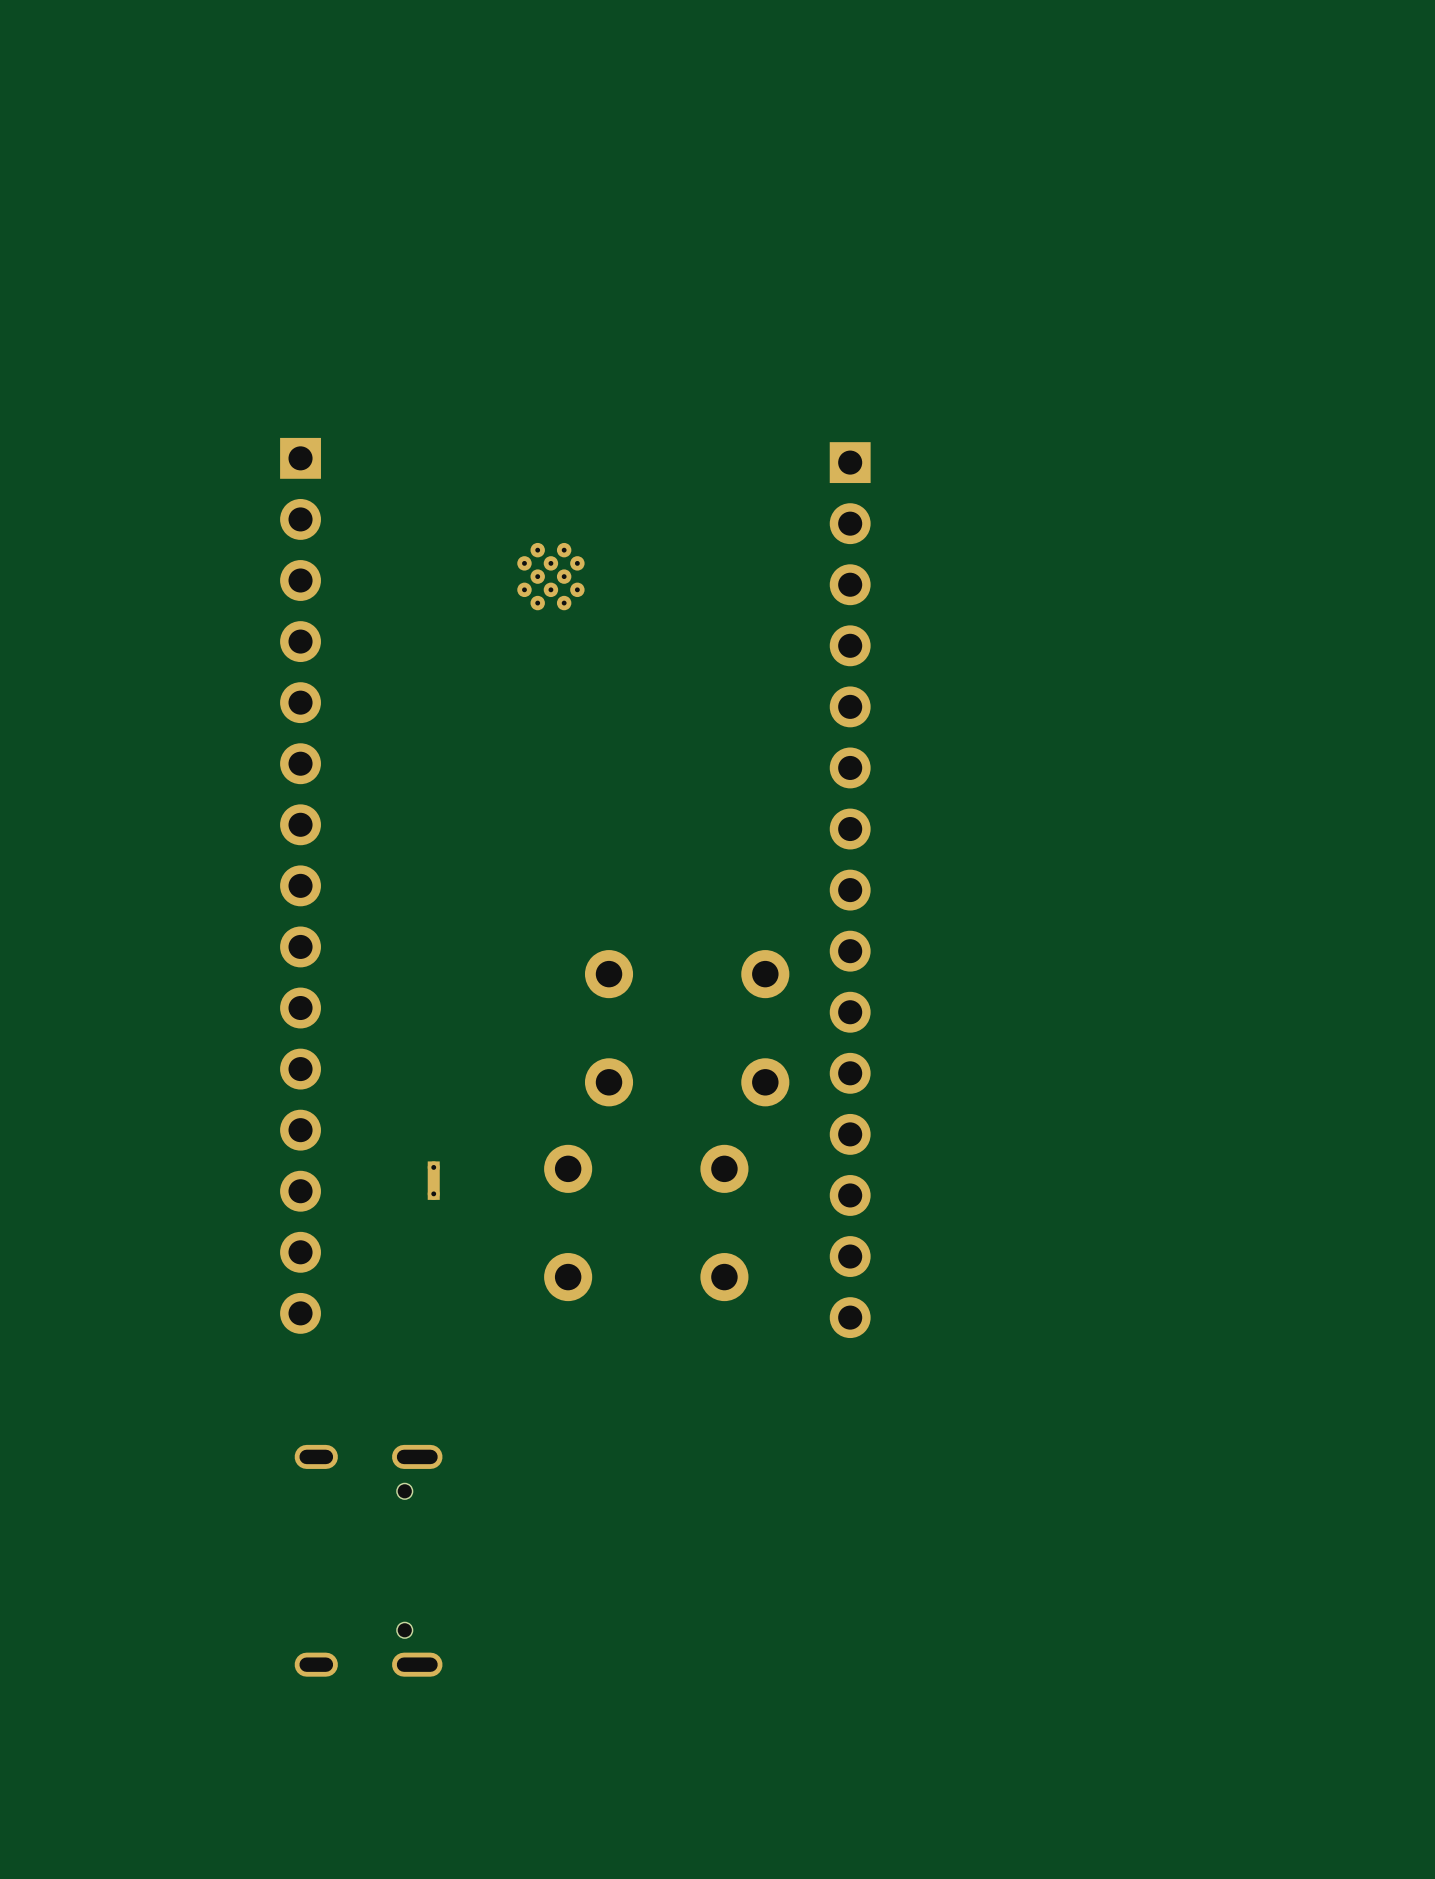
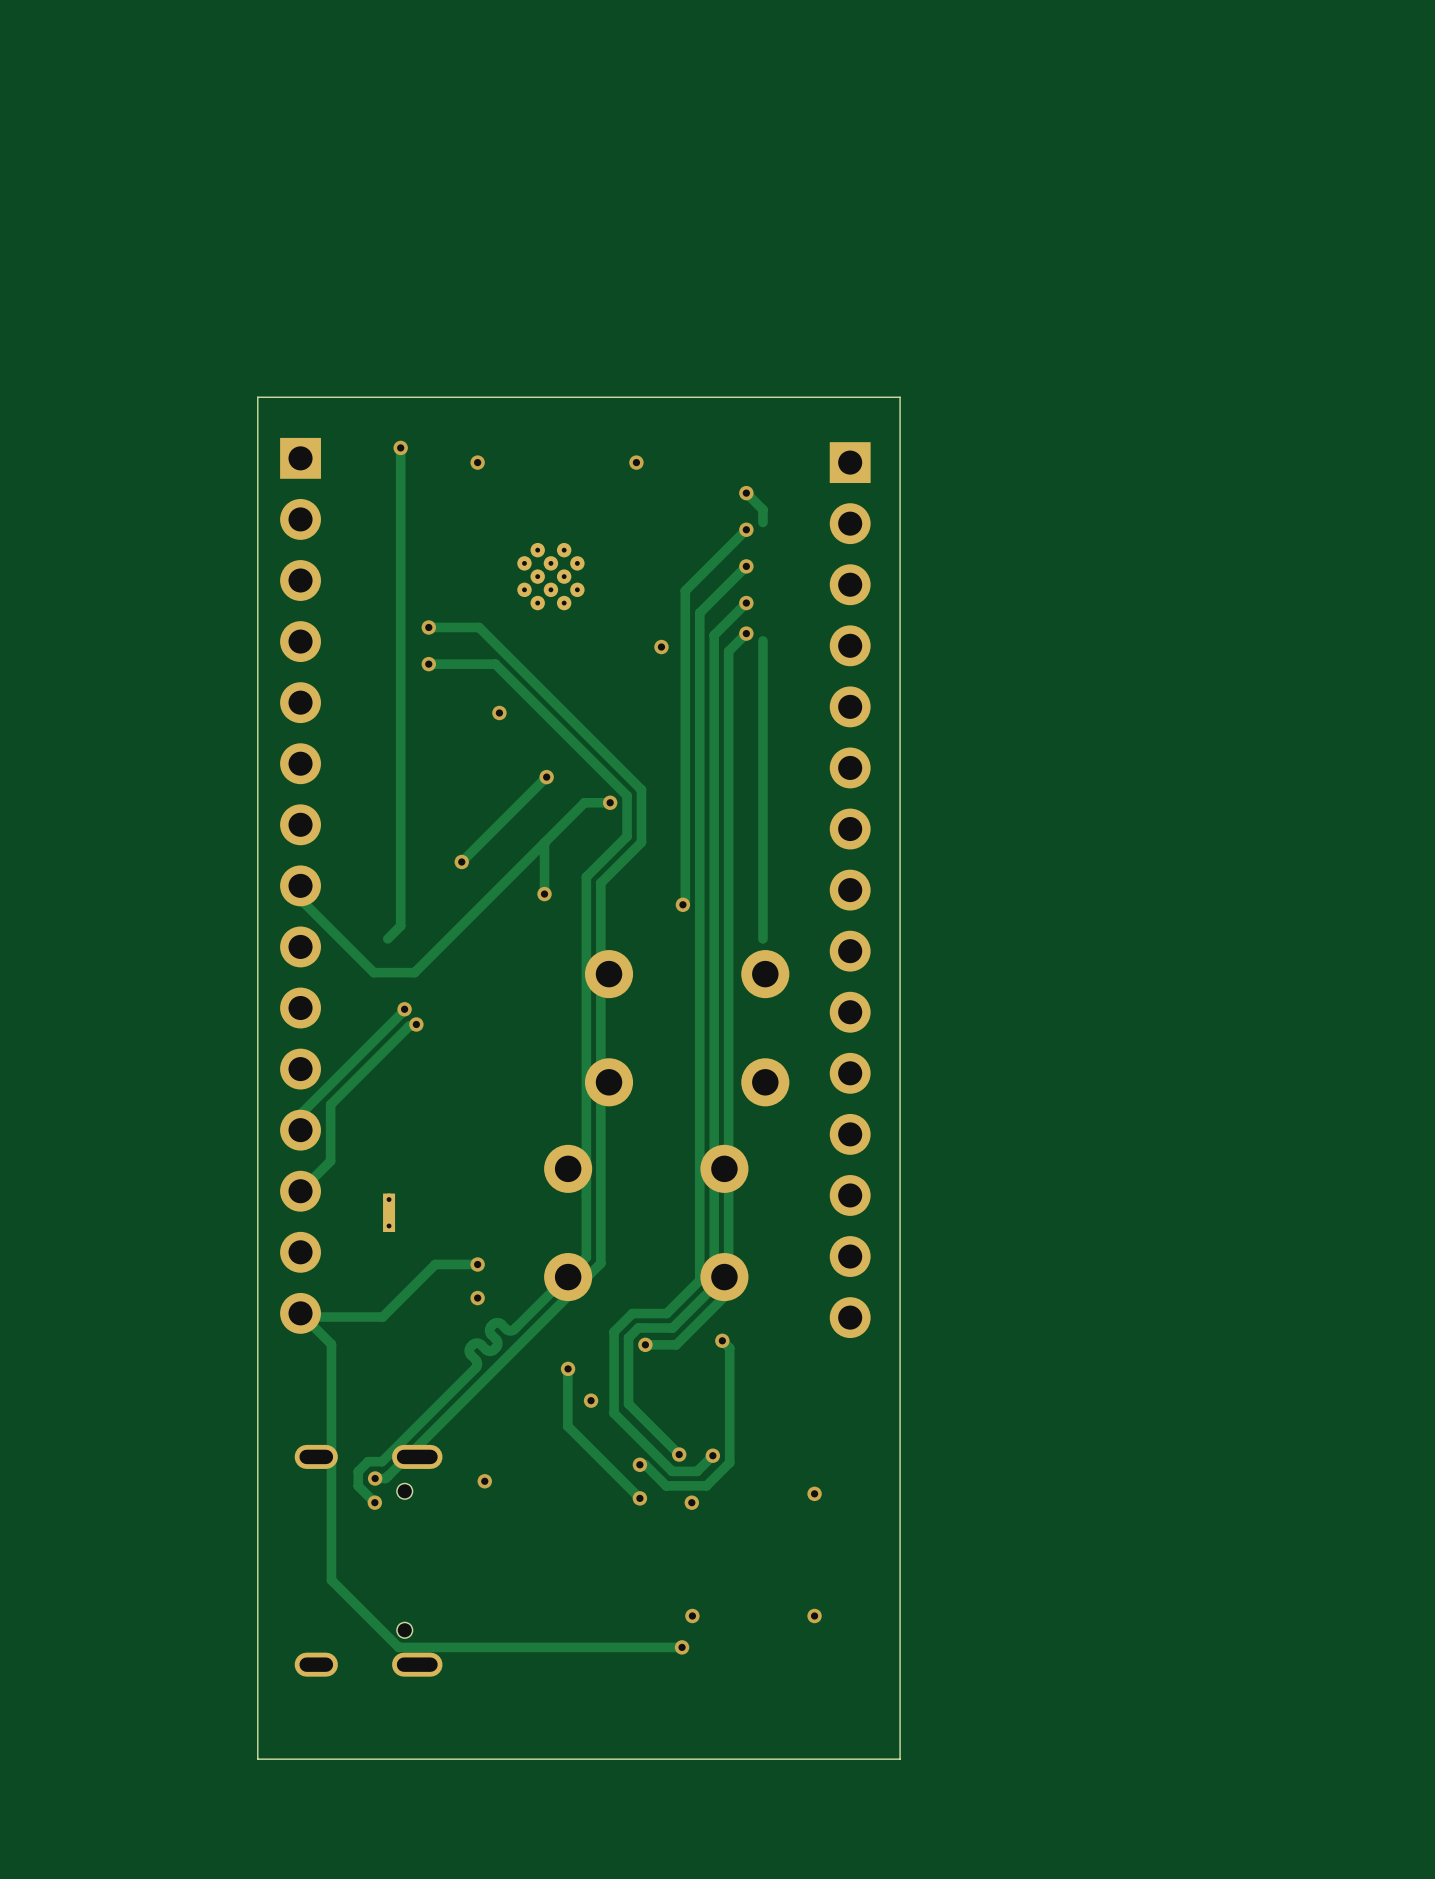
board edge: none -> (900, 397) (257, 397) (257, 1759) (900, 1759) (900, 397)
track: none -> (400, 447) (400, 926) (387, 938)
via: none -> (400, 447)
via: none -> (477, 462)
via: none -> (636, 462)
track: none -> (746, 493) (762, 509) (762, 522)
via: none -> (746, 493)
track: none -> (746, 529) (685, 590) (685, 902) (682, 904)
via: none -> (746, 529)
track: none -> (746, 566) (699, 613) (699, 1280) (666, 1313) (632, 1313) (614, 1331) (614, 1413) (672, 1471) (697, 1471) (712, 1455)
via: none -> (746, 566)
track: none -> (746, 603) (714, 635) (714, 1286) (672, 1327) (638, 1327) (628, 1337) (628, 1403) (679, 1454)
via: none -> (746, 603)
track: none -> (428, 627) (479, 627) (641, 789) (641, 842) (600, 883) (600, 1263) (388, 1476) (385, 1478) (375, 1478)
via: none -> (428, 627)
track: none -> (746, 633) (728, 651) (728, 1292) (676, 1344) (645, 1344)
via: none -> (746, 633)
track: none -> (762, 640) (762, 938)
via: none -> (661, 647)
track: none -> (428, 664) (495, 664) (627, 795) (627, 836) (586, 877) (586, 1257) (514, 1329) (507, 1330) (498, 1322) (493, 1324) (489, 1331) (497, 1341) (496, 1347) (489, 1351) (478, 1343) (472, 1344) (469, 1351) (477, 1362) (475, 1368) (382, 1461) (368, 1461) (358, 1471) (358, 1486) (374, 1502)
via: none -> (428, 664)
via: none -> (499, 712)
track: none -> (546, 777) (461, 862)
via: none -> (546, 777)
track: none -> (610, 802) (584, 802) (414, 972) (373, 972) (300, 899) (300, 885)
via: none -> (610, 802)
track: none -> (544, 842) (544, 894)
via: none -> (461, 862)
via: none -> (544, 894)
via: none -> (682, 904)
track: none -> (404, 1009) (300, 1114) (300, 1130)
via: none -> (404, 1009)
track: none -> (416, 1024) (409, 1026) (330, 1104) (330, 1161) (300, 1191)
via: none -> (416, 1024)
part position: (433, 1180) -> (389, 1212)
track: none -> (477, 1264) (435, 1264) (382, 1317) (304, 1317)
via: none -> (477, 1264)
via: none -> (477, 1298)
track: none -> (300, 1313) (331, 1344) (331, 1580) (398, 1647) (682, 1647)
track: none -> (722, 1340) (729, 1348) (729, 1462) (706, 1485) (666, 1485) (645, 1464) (639, 1464)
via: none -> (722, 1340)
via: none -> (645, 1344)
via: none -> (568, 1368)
track: none -> (567, 1369) (567, 1426) (639, 1498)
via: none -> (591, 1400)
via: none -> (679, 1454)
via: none -> (712, 1455)
via: none -> (639, 1464)
via: none -> (375, 1478)
via: none -> (484, 1481)
via: none -> (814, 1493)
via: none -> (639, 1498)
via: none -> (374, 1502)
via: none -> (691, 1502)
via: none -> (692, 1616)
via: none -> (814, 1616)
via: none -> (682, 1647)

